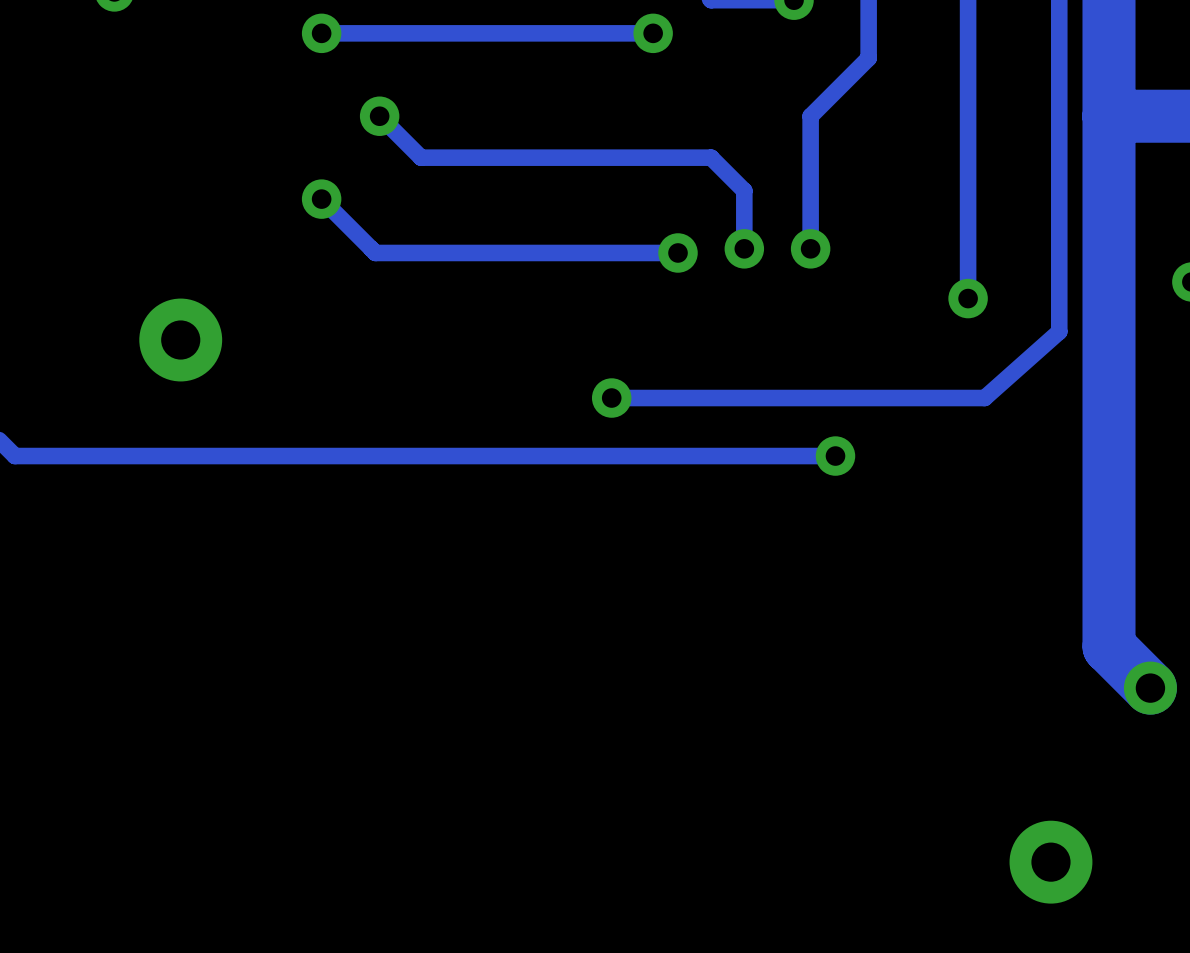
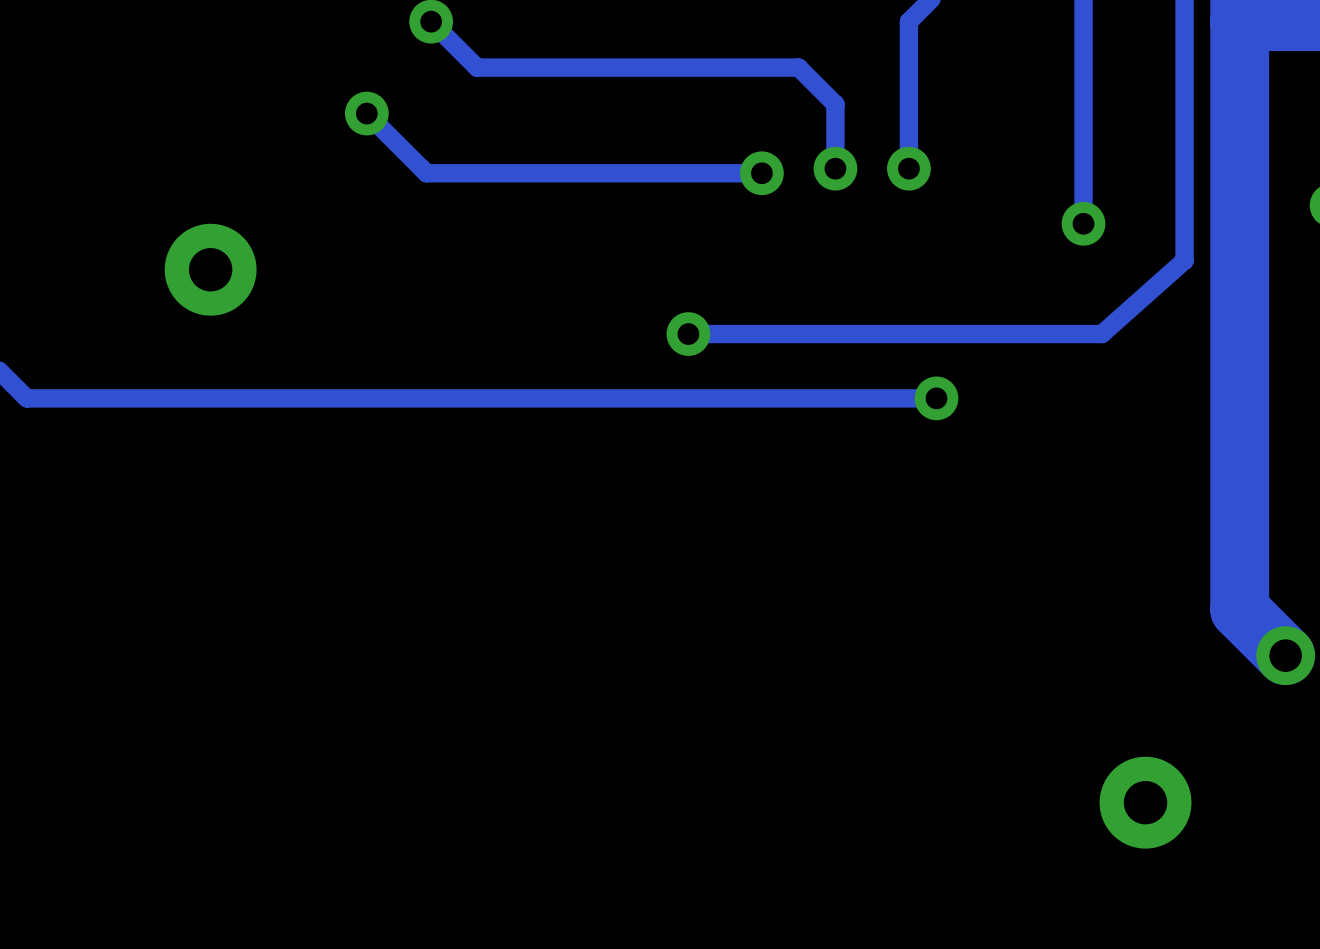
via position: (1050, 862) -> (1145, 802)

